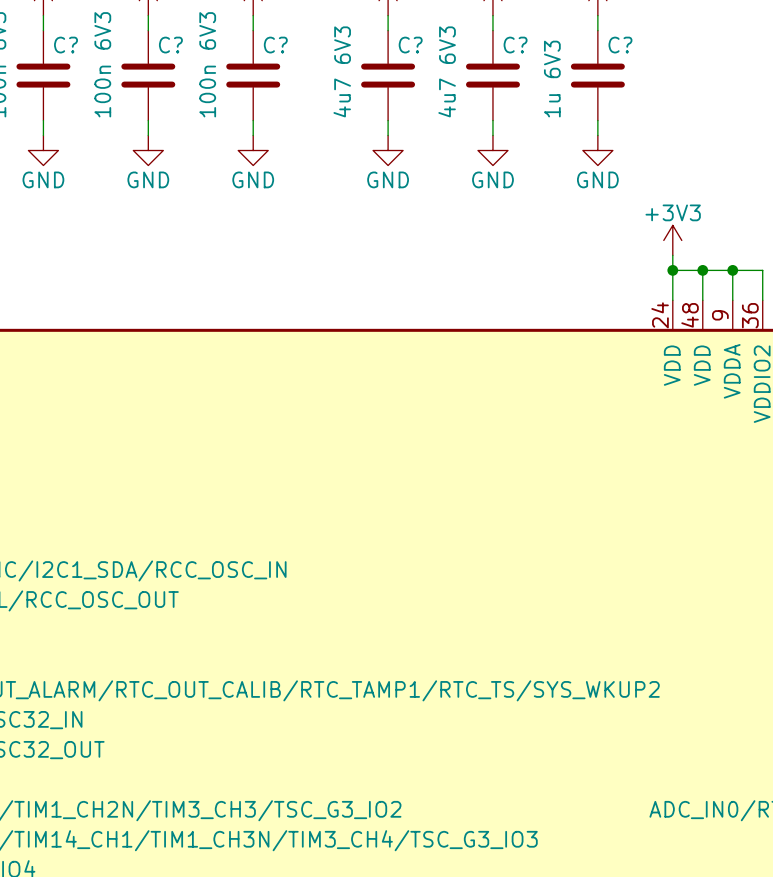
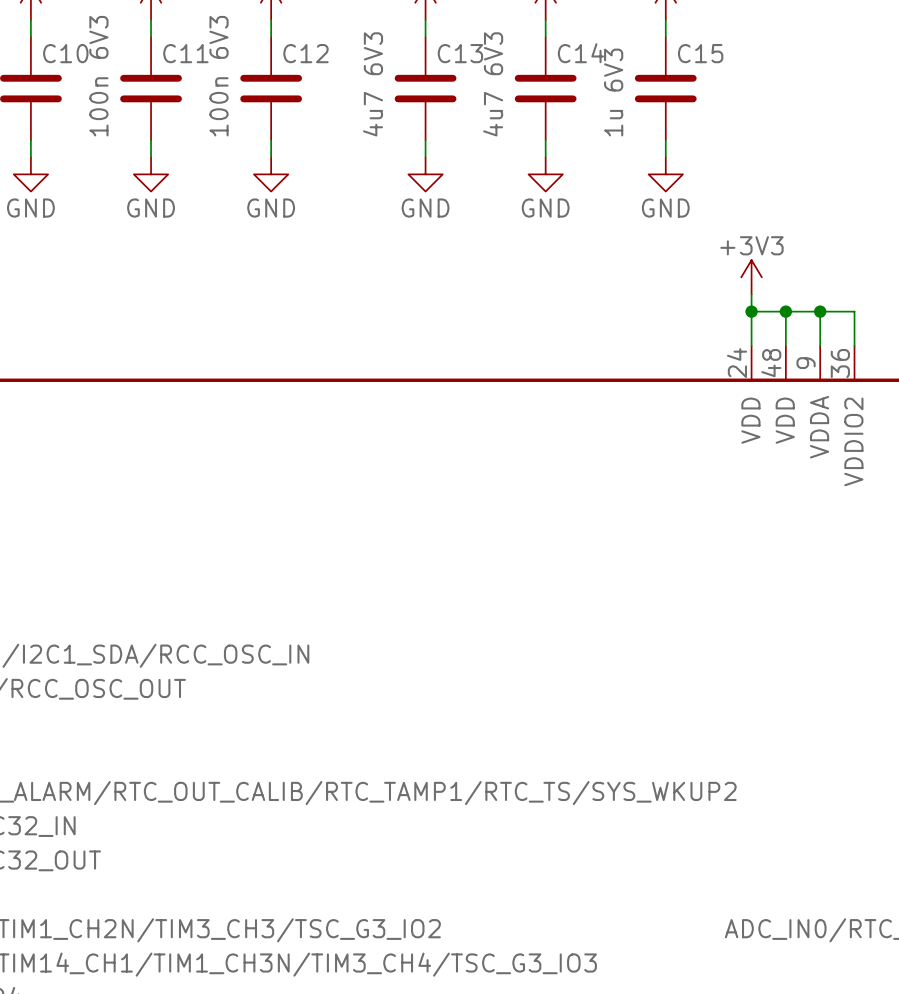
C? name: C? (66, 45) -> C10 (65, 53)
C? name: C? (170, 45) -> C11 (185, 53)
C? name: C? (275, 45) -> C12 (305, 53)
C? name: C? (410, 45) -> C13 (460, 53)
C? name: C? (515, 45) -> C14 (580, 53)
C? name: C? (620, 45) -> C15 (700, 53)

